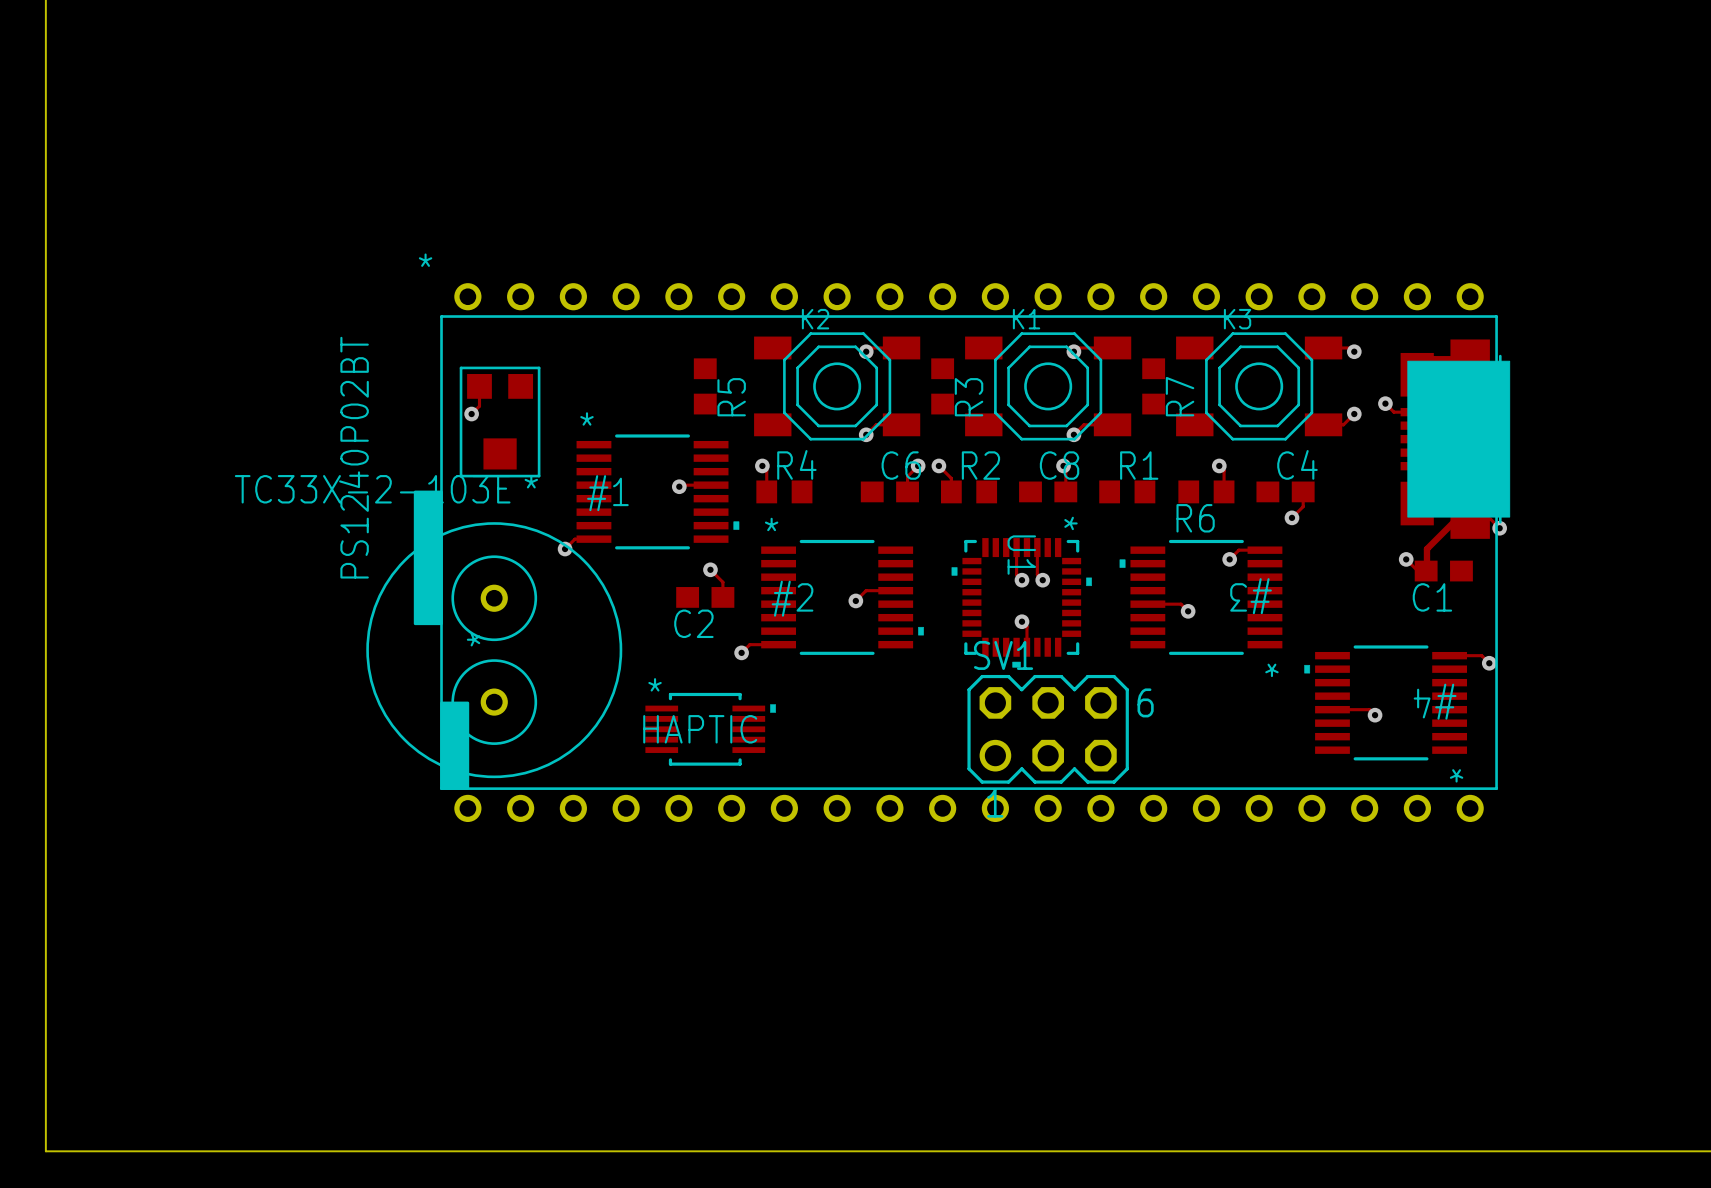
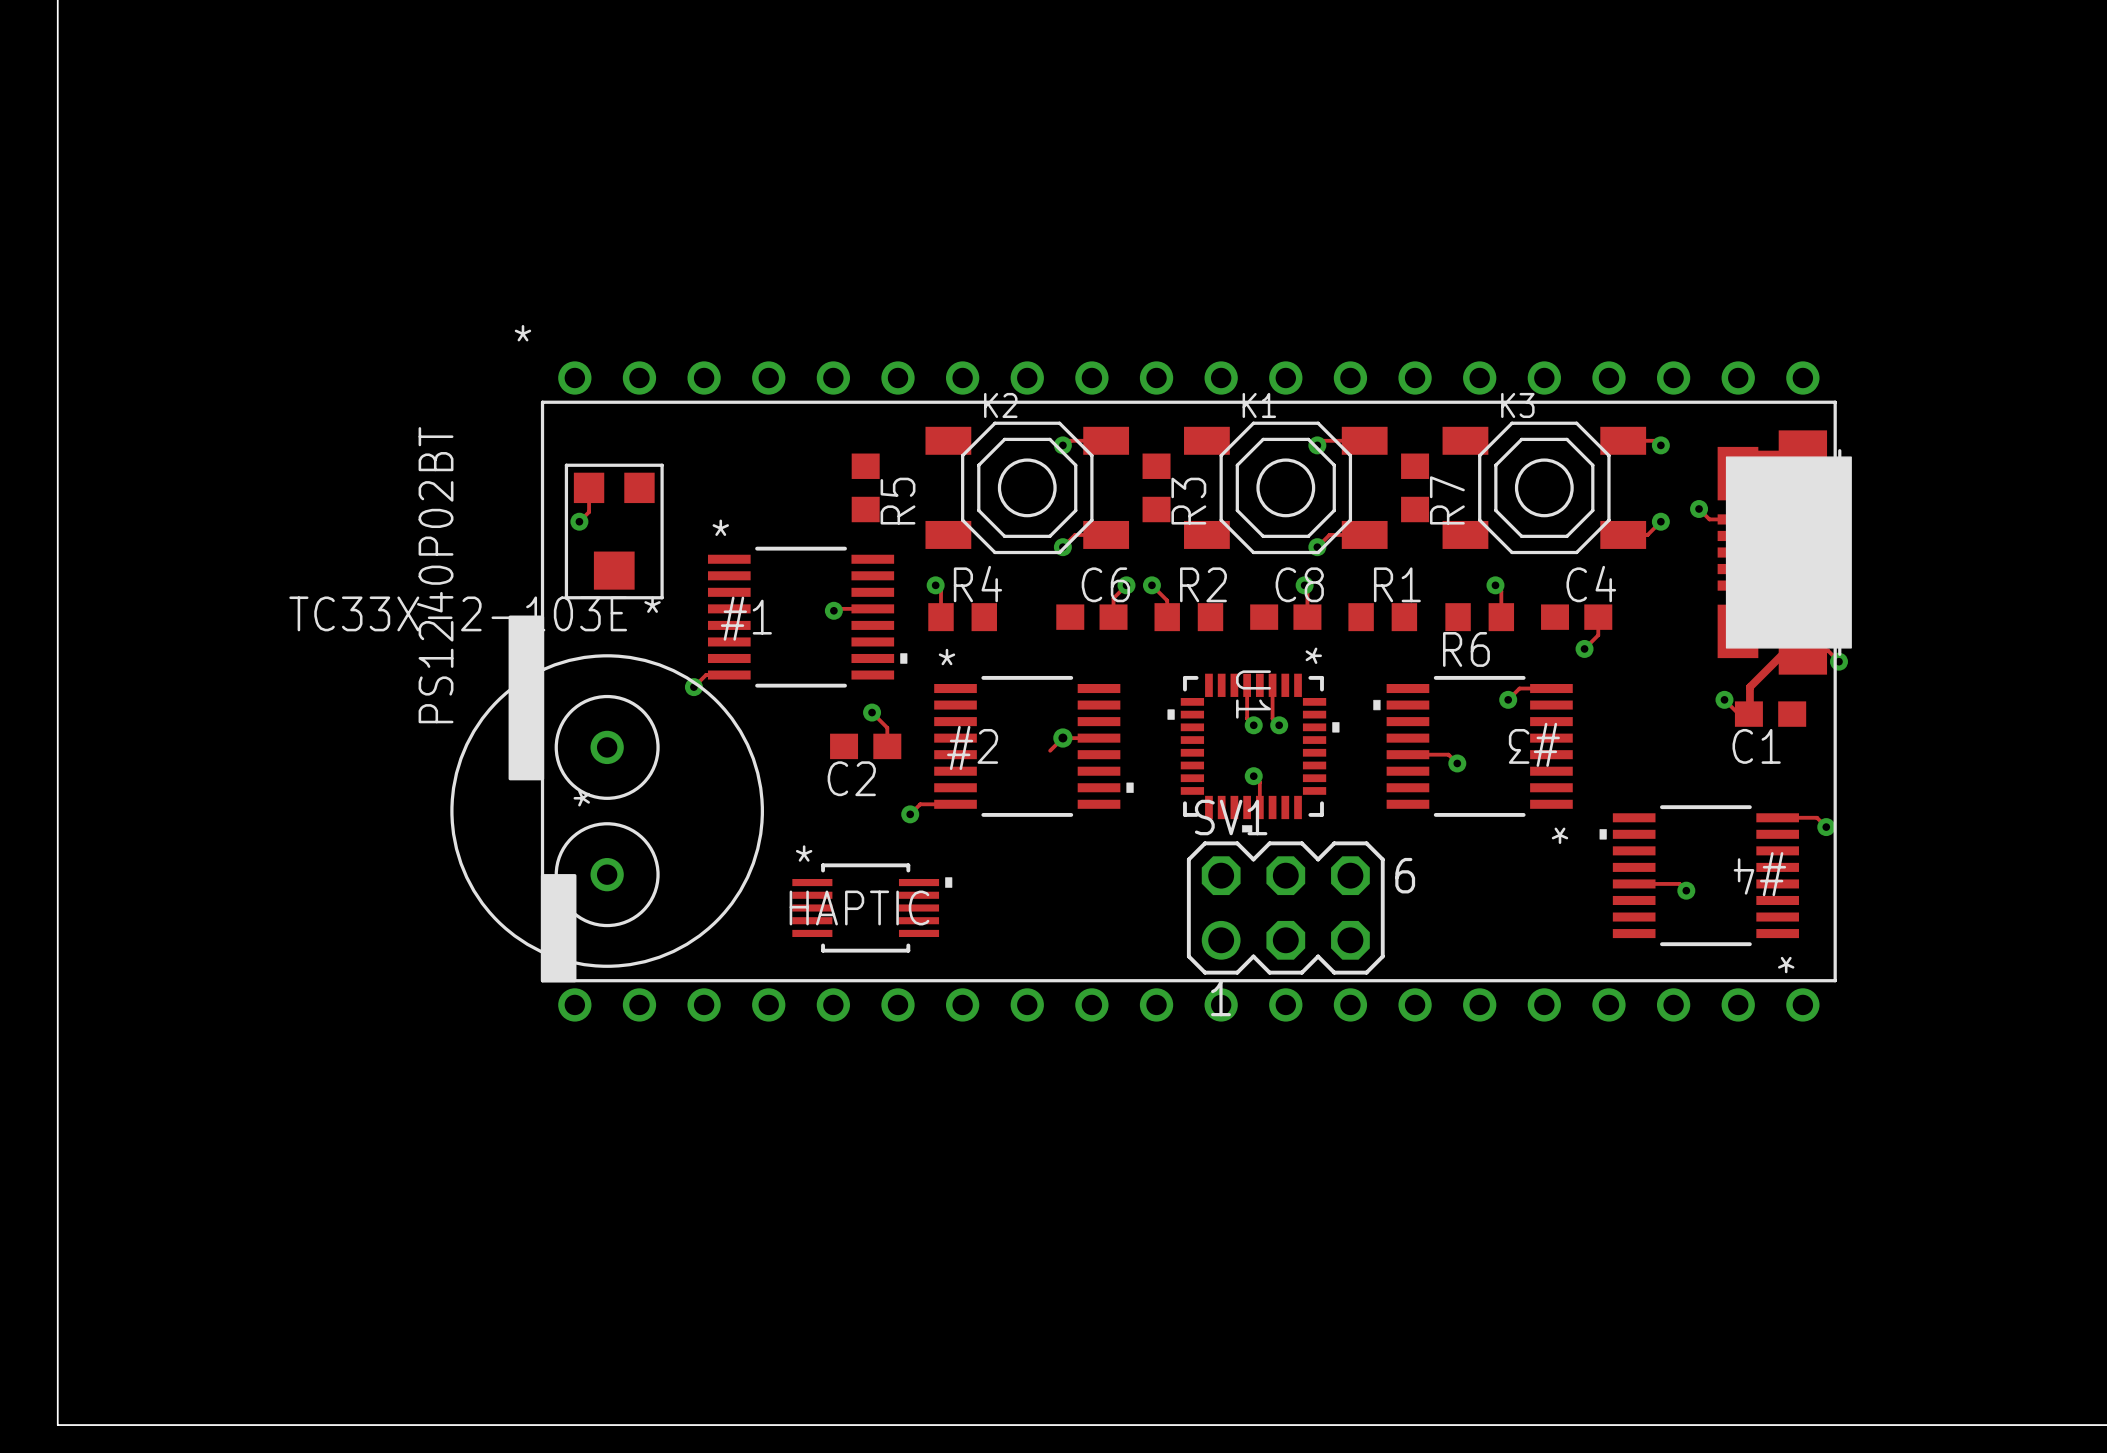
via position: (855, 600) -> (1062, 738)

